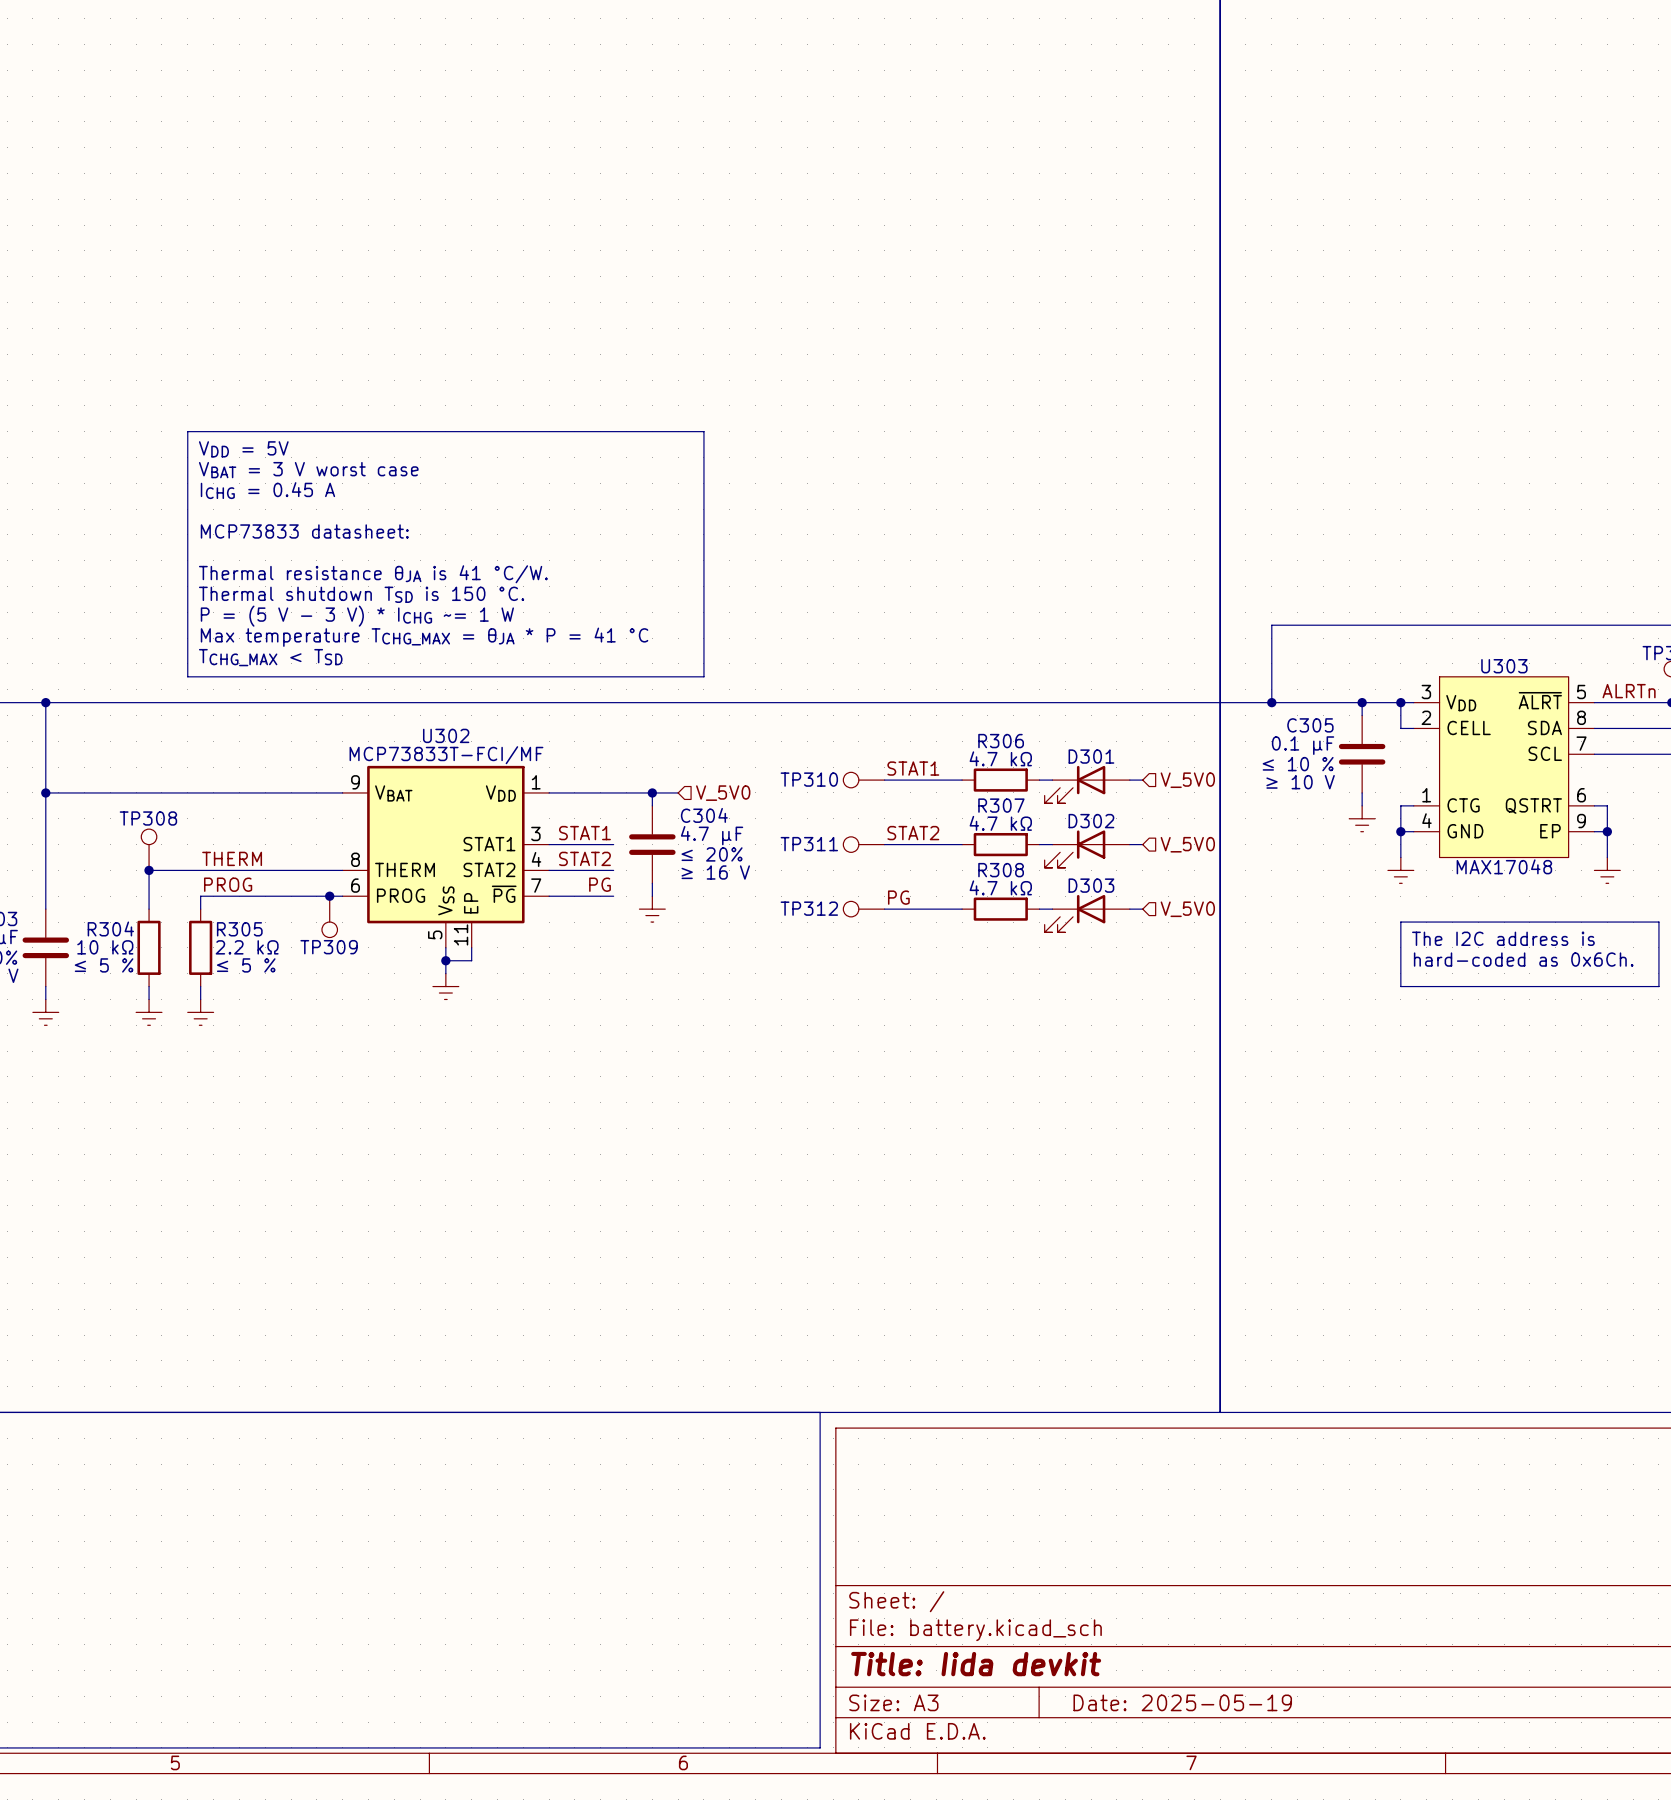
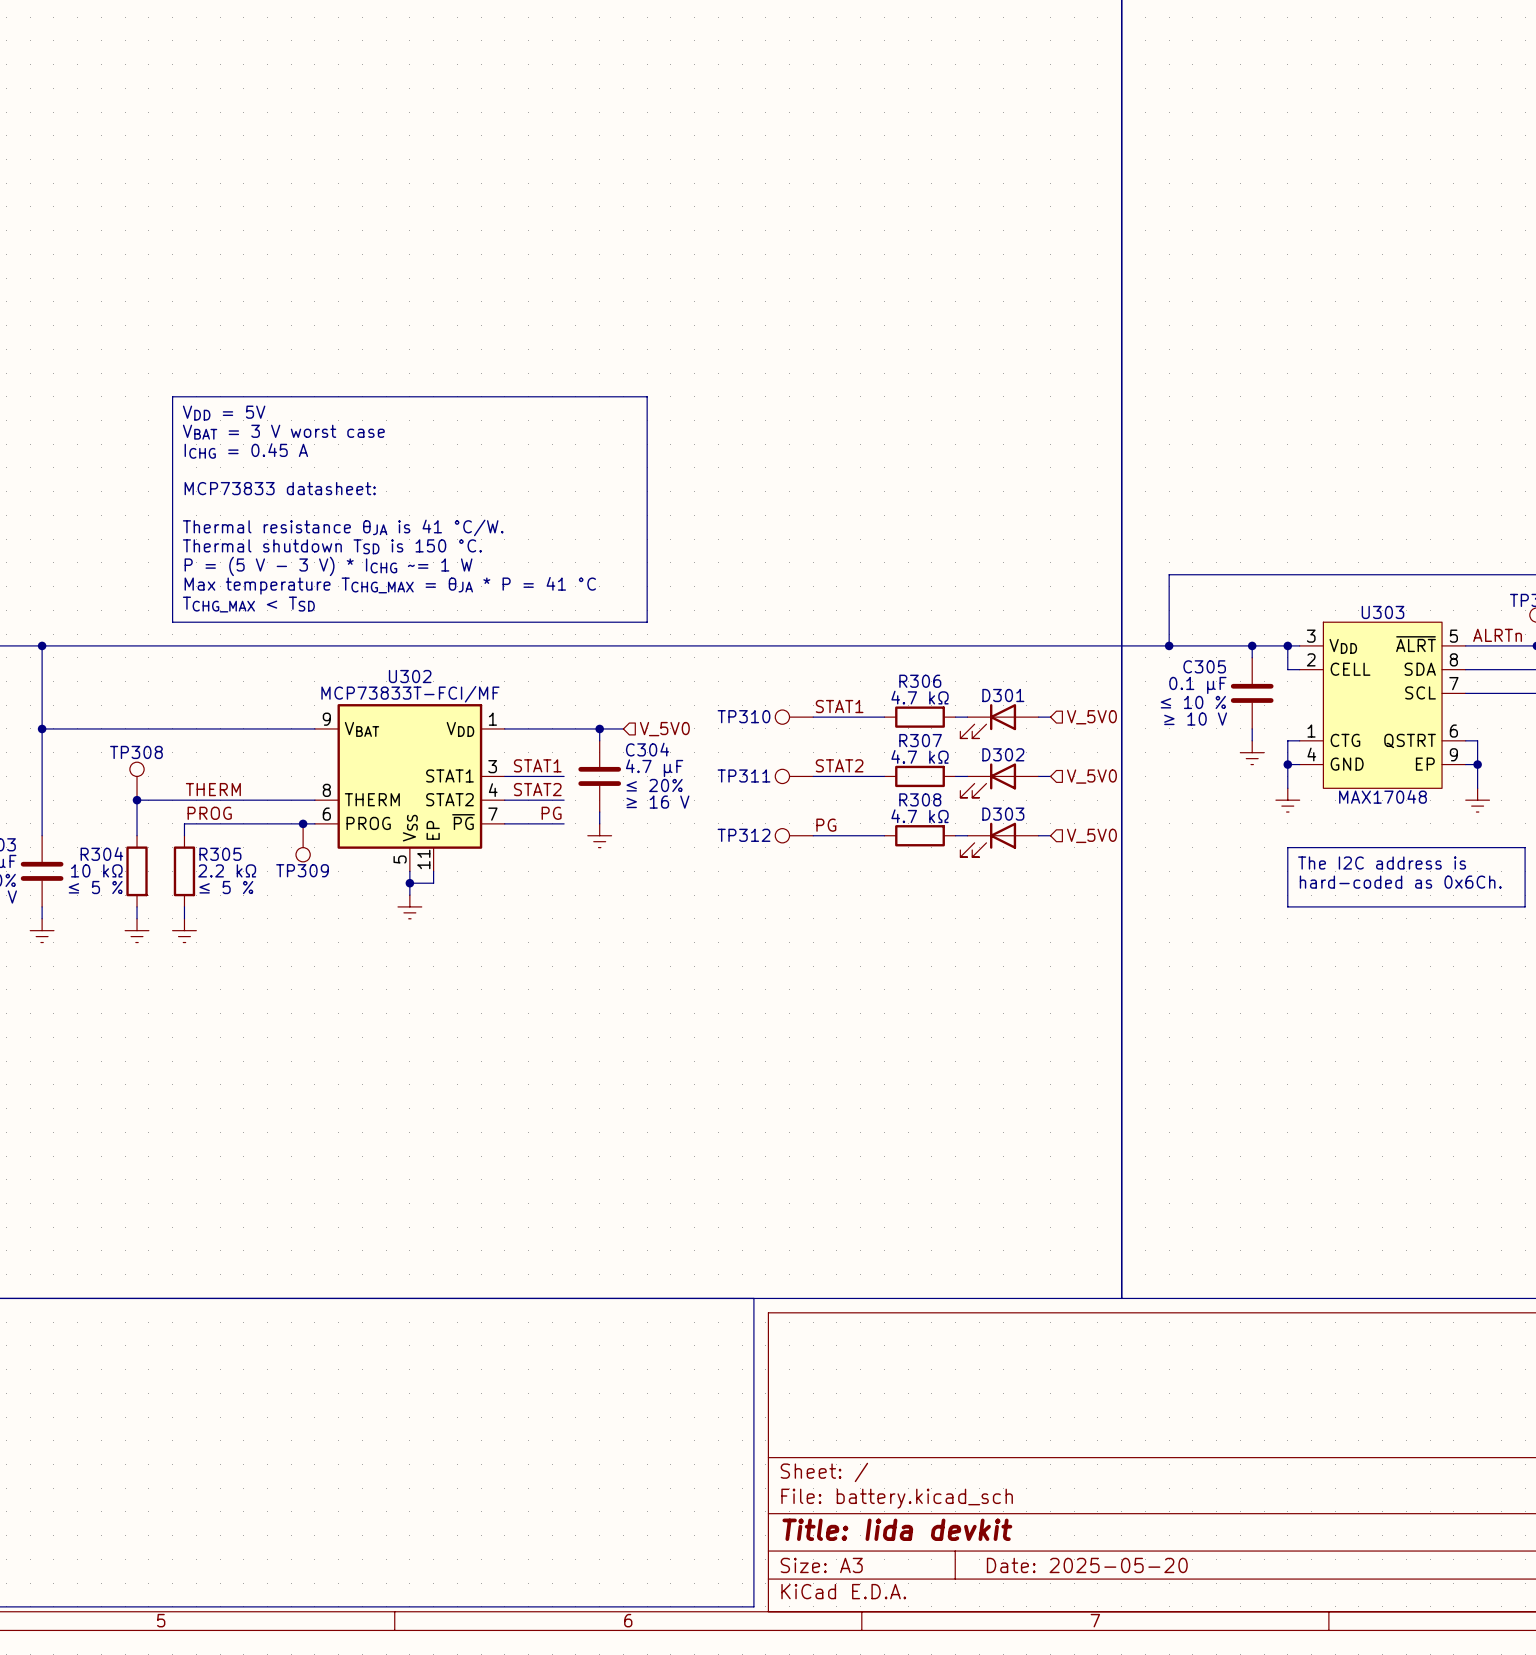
title block: Date: 2025-05-19 (1182, 1702) -> Date: 2025-05-20 (1087, 1565)

